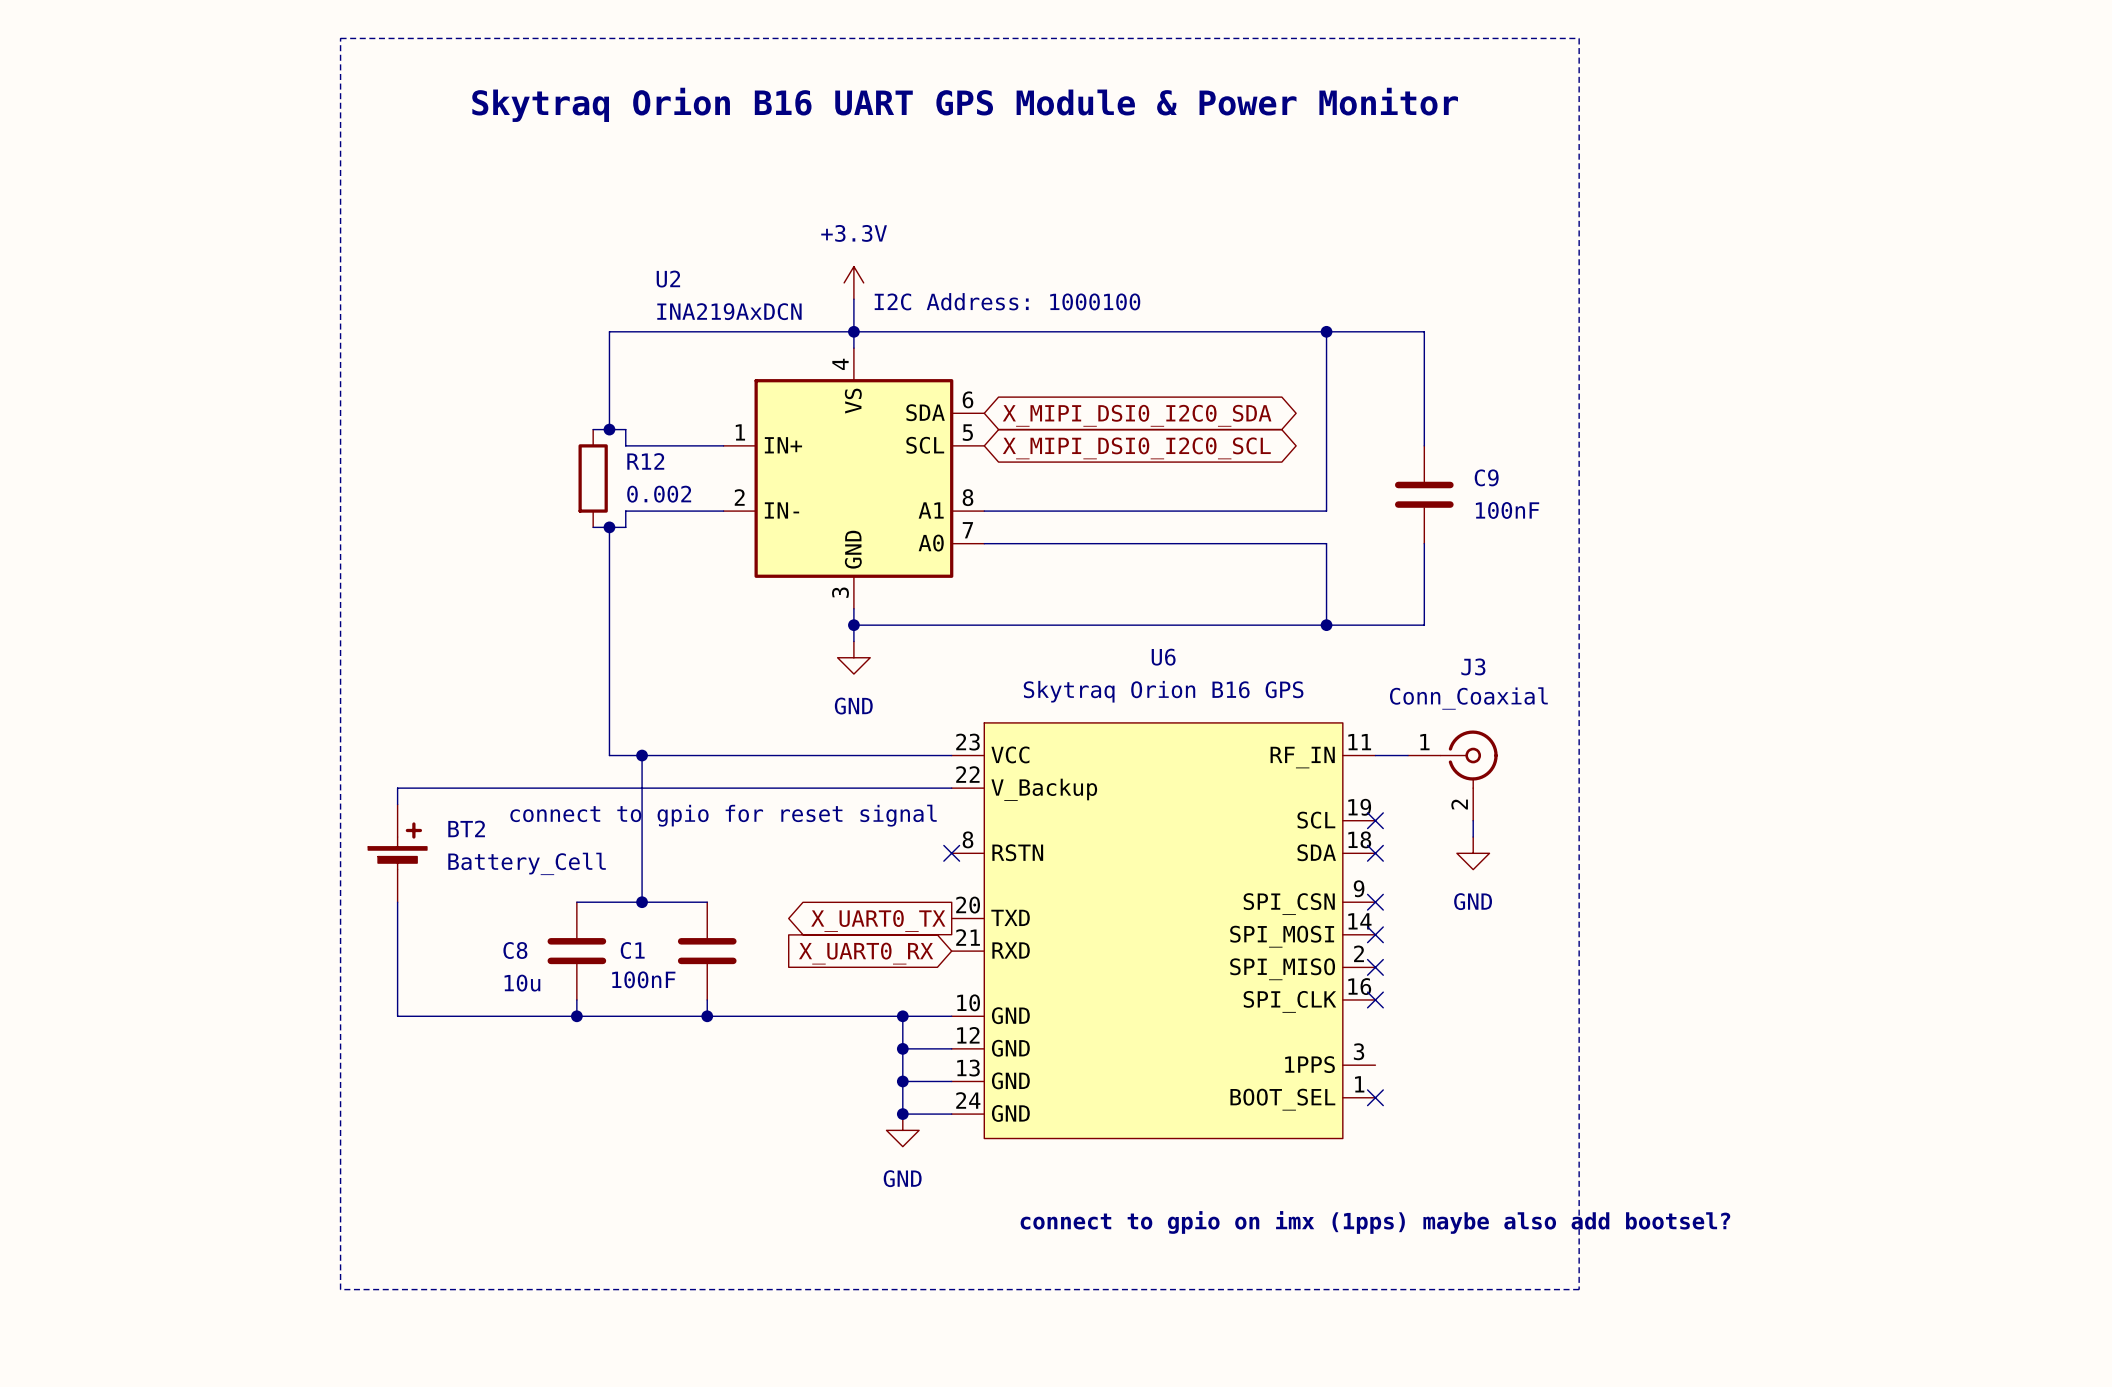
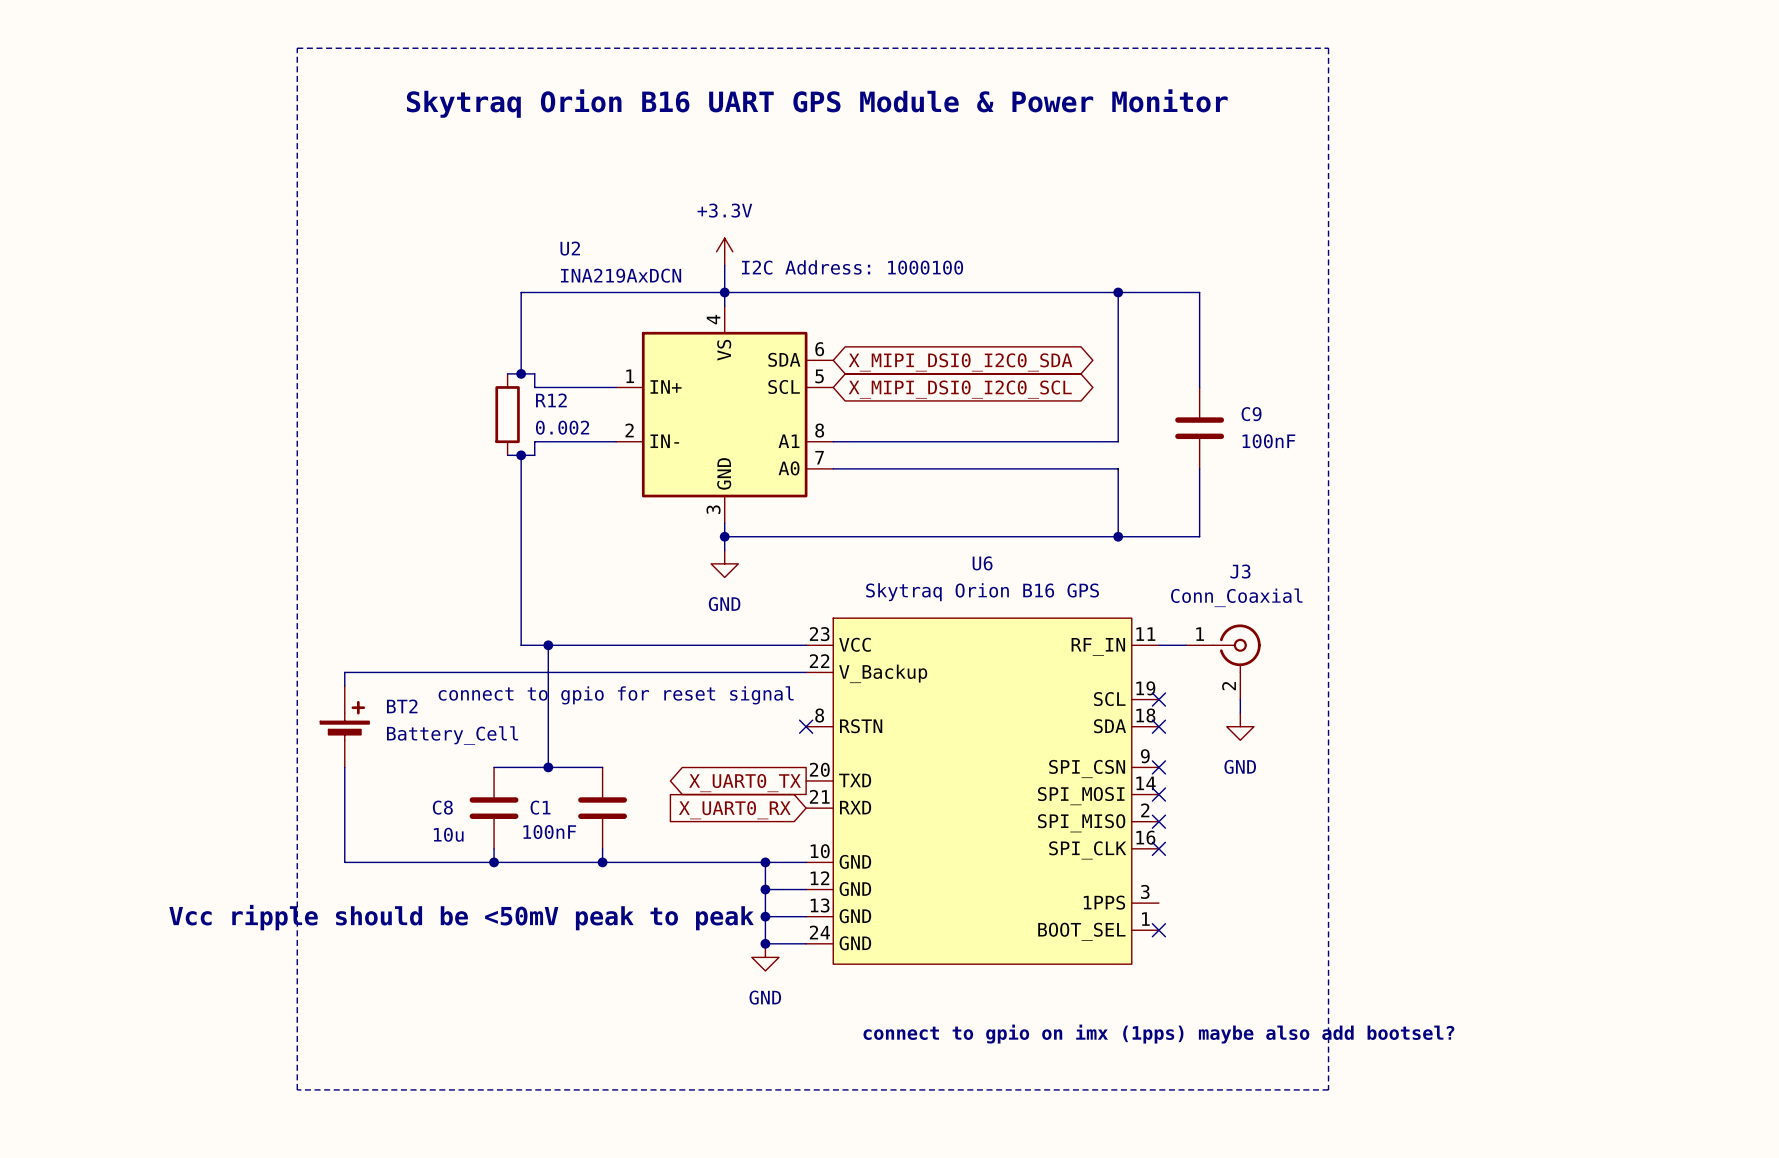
text: none -> Vcc ripple should be <50mV peak to peak (461, 917)

